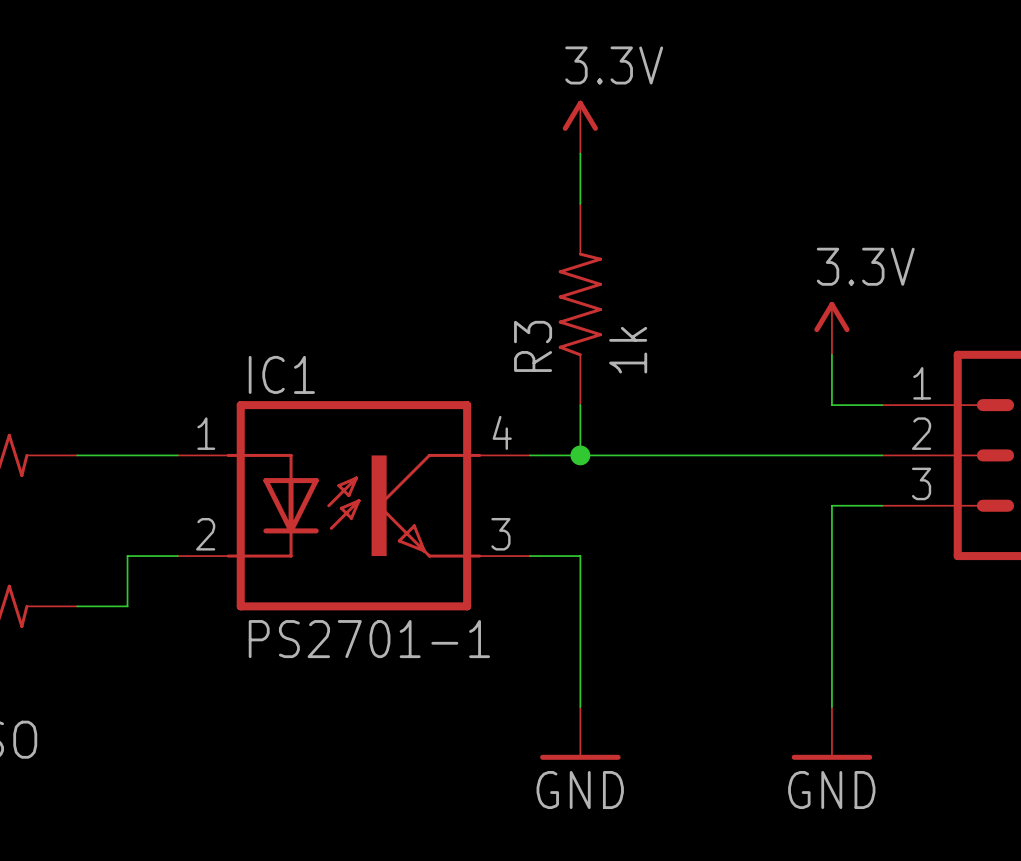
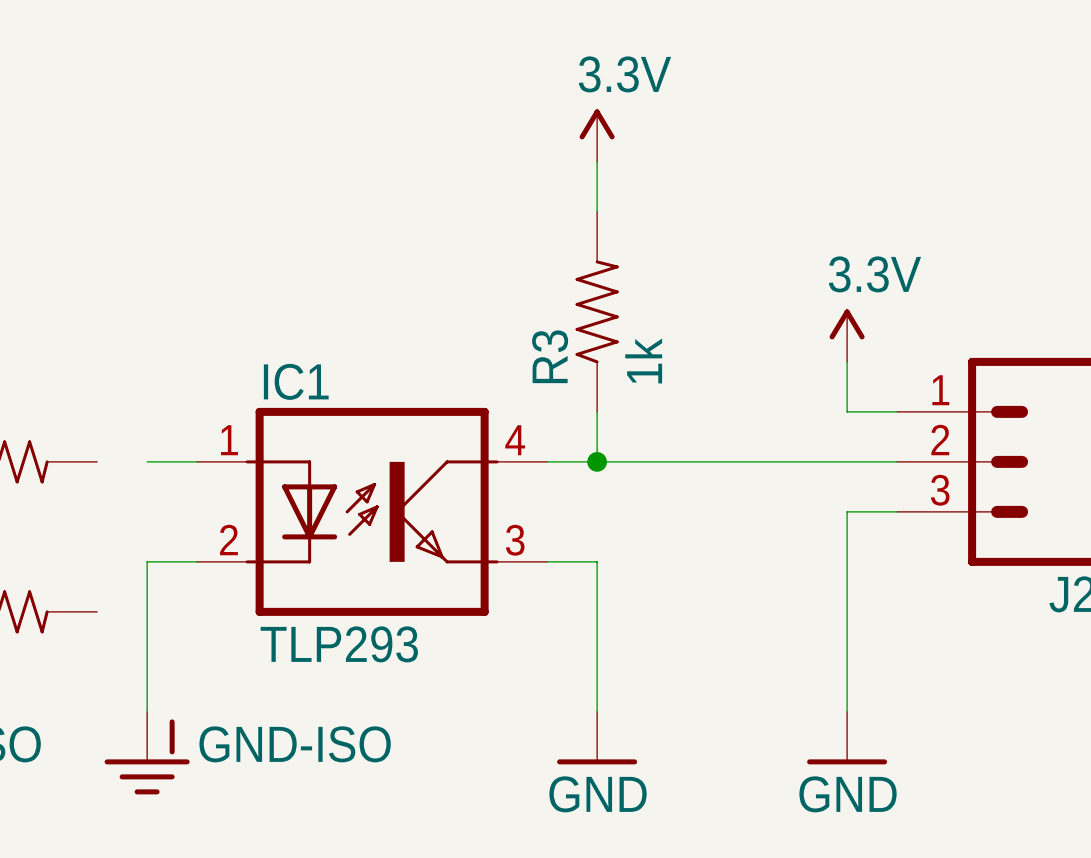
wire: (77, 455) (127, 455) -> none
wire: (77, 606) (127, 606) -> (147, 711) (147, 611)
IC1 value: PS2701-1 (369, 639) -> TLP293 (339, 644)
power symbol: none -> GND-ISO (147, 753)

